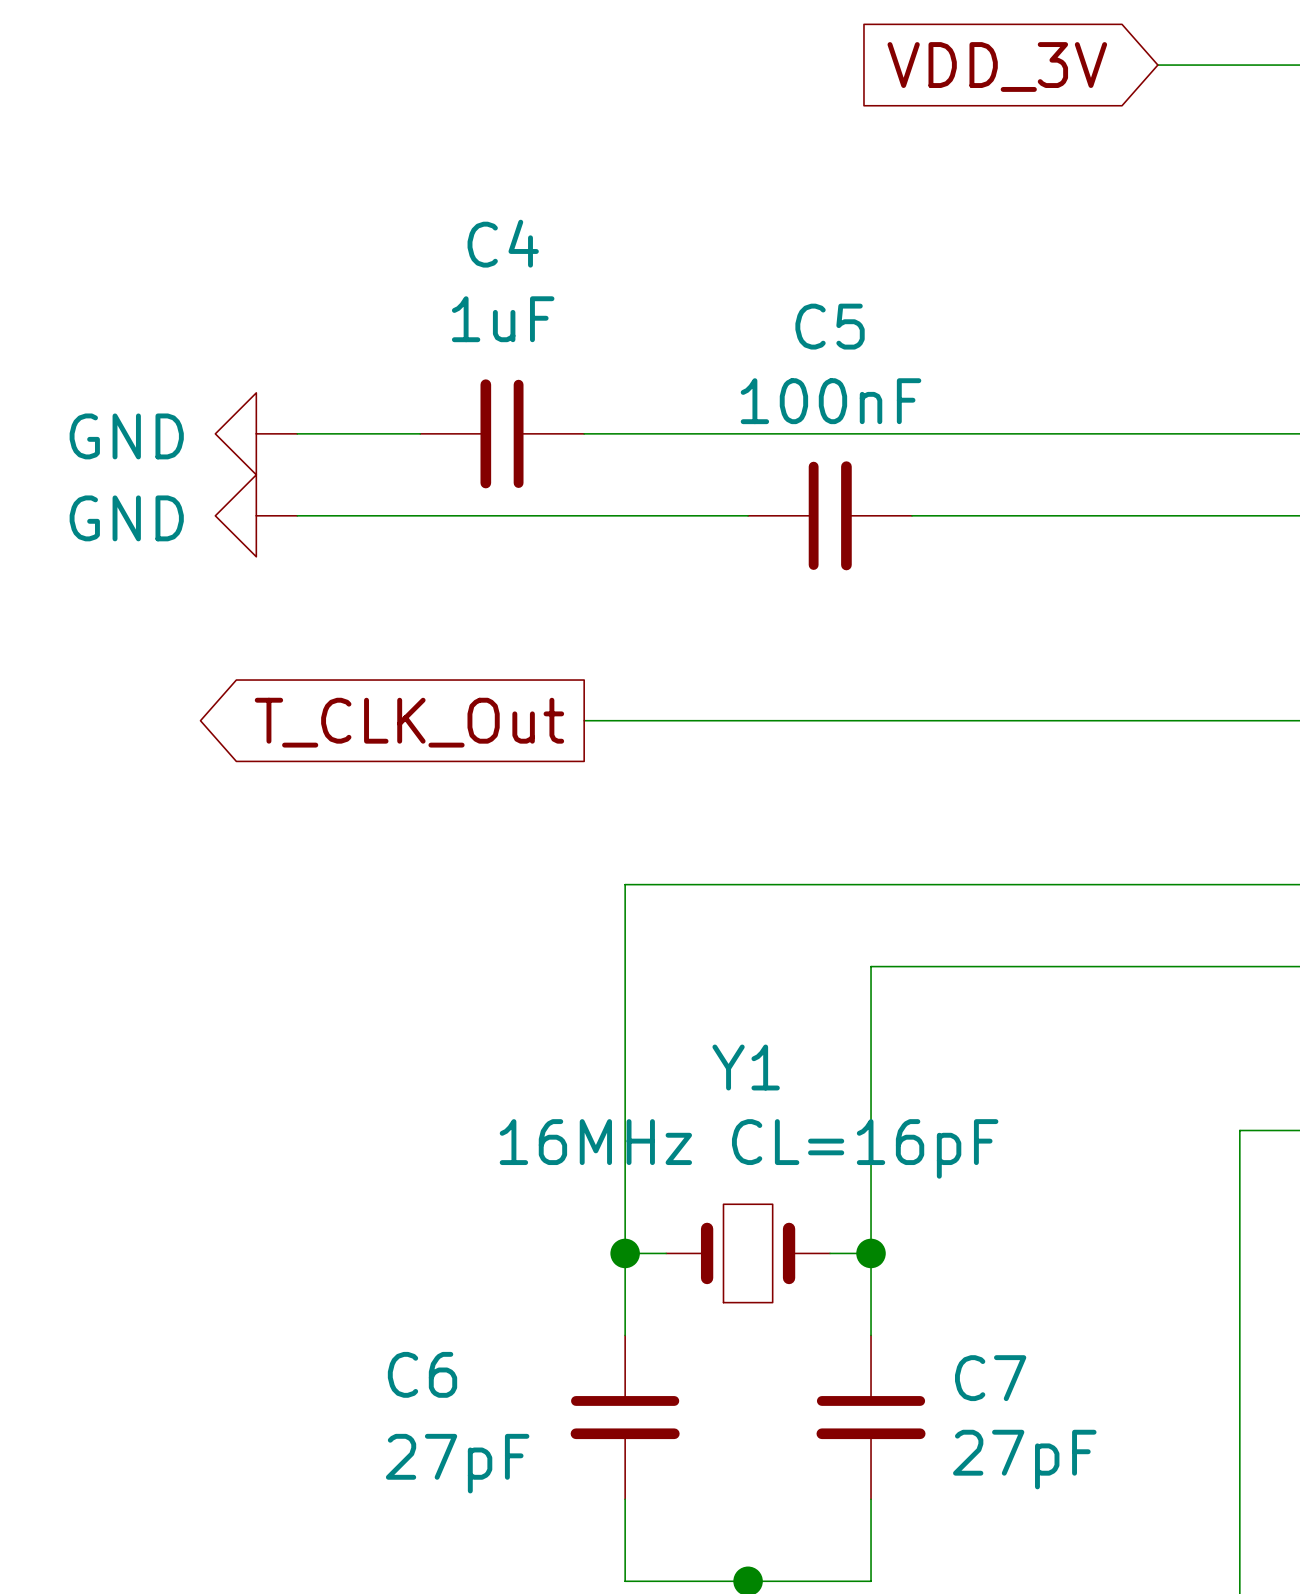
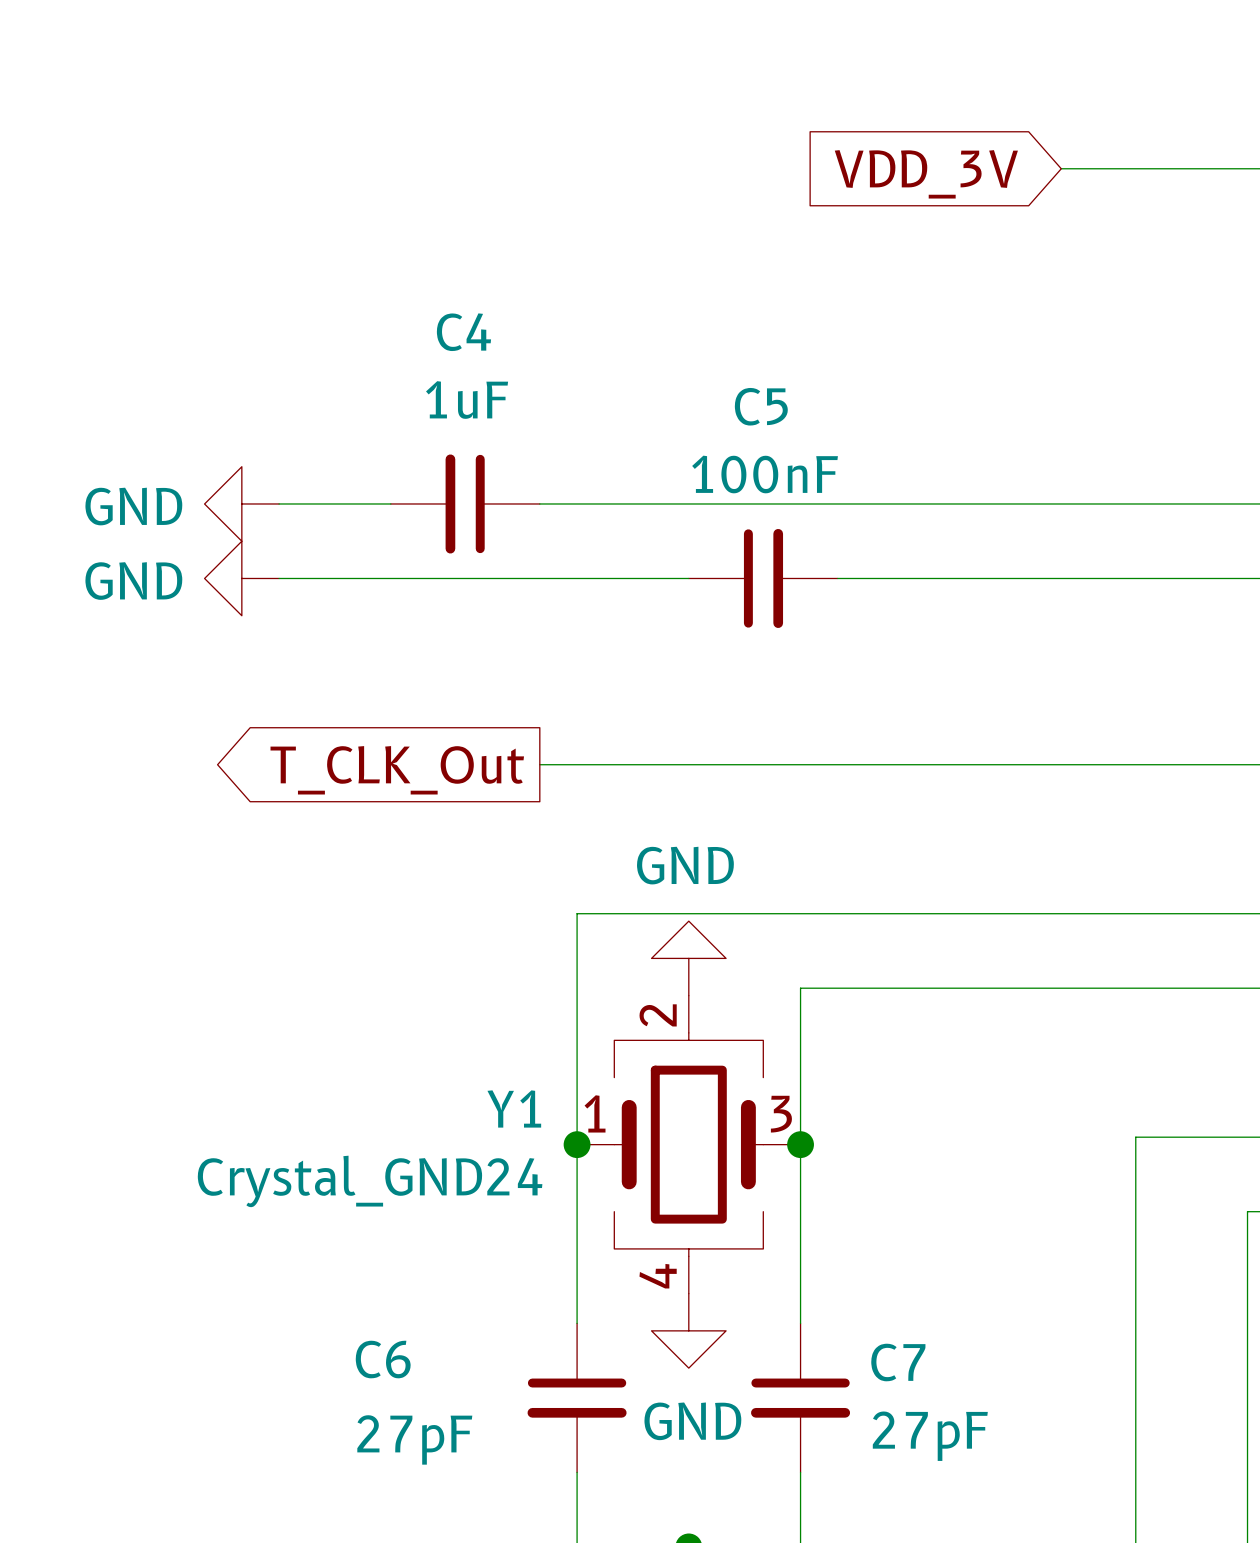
power symbol: none -> GND (688, 958)
Y1 name position: Y1 (746, 1067) -> Y1 (514, 1108)
Y1 value: 16MHz CL=16pF (749, 1148) -> Crystal_GND24 (370, 1181)
Y1 symbol: [666, 1204, 831, 1303] -> [577, 995, 801, 1294]
wire: (625, 1253) (666, 1253) -> none
junction position: (625, 1253) -> (577, 1144)
wire: (830, 1253) (871, 1253) -> none
junction position: (871, 1253) -> (800, 1144)
power symbol: none -> GND (688, 1330)

